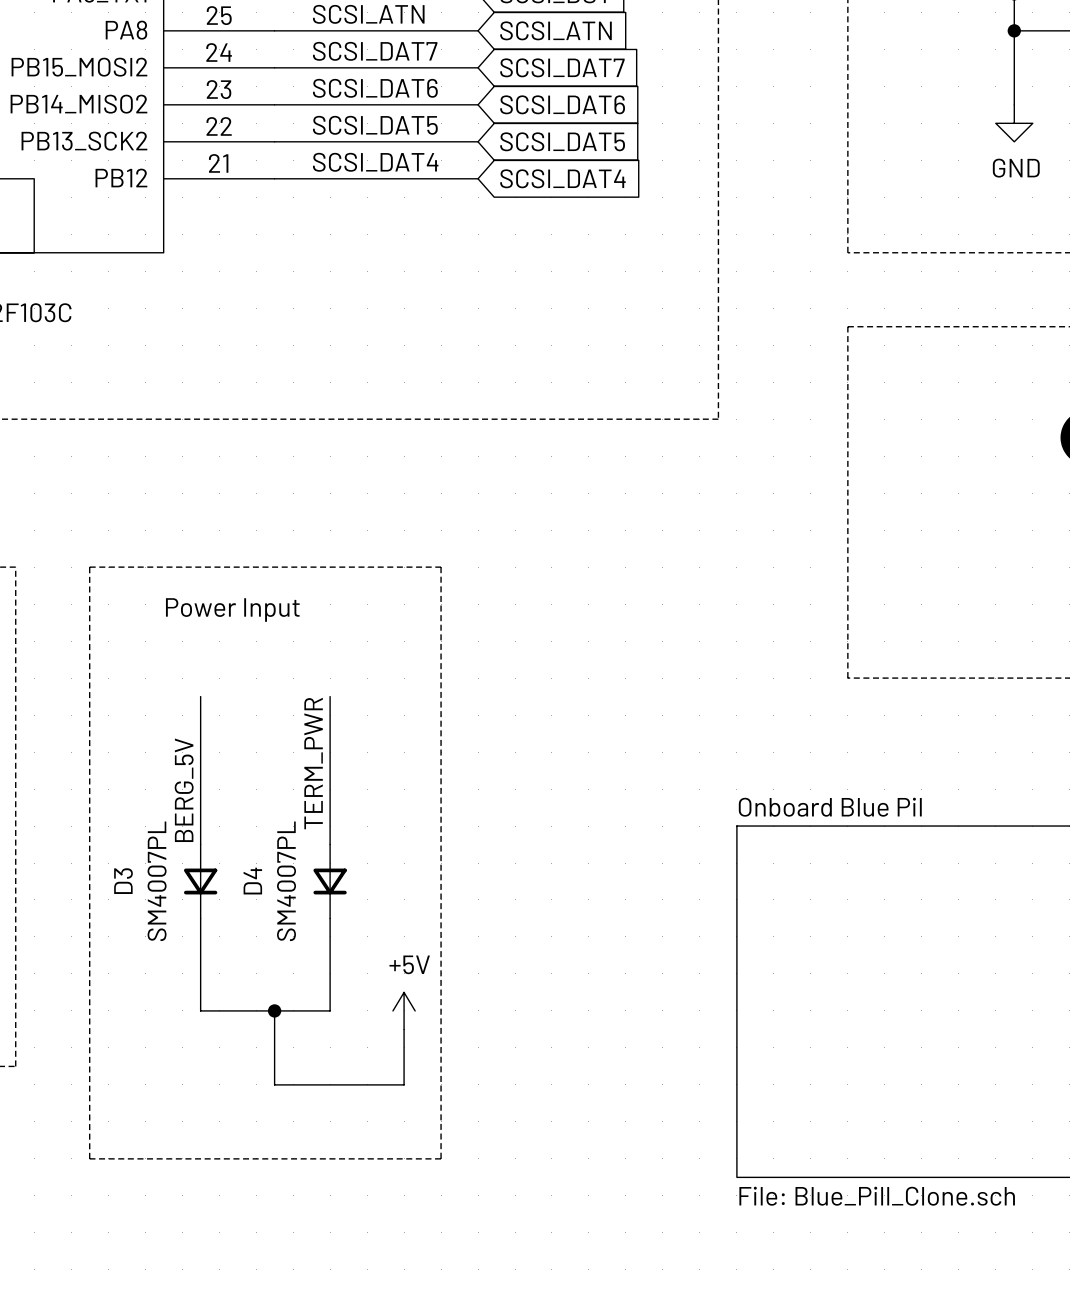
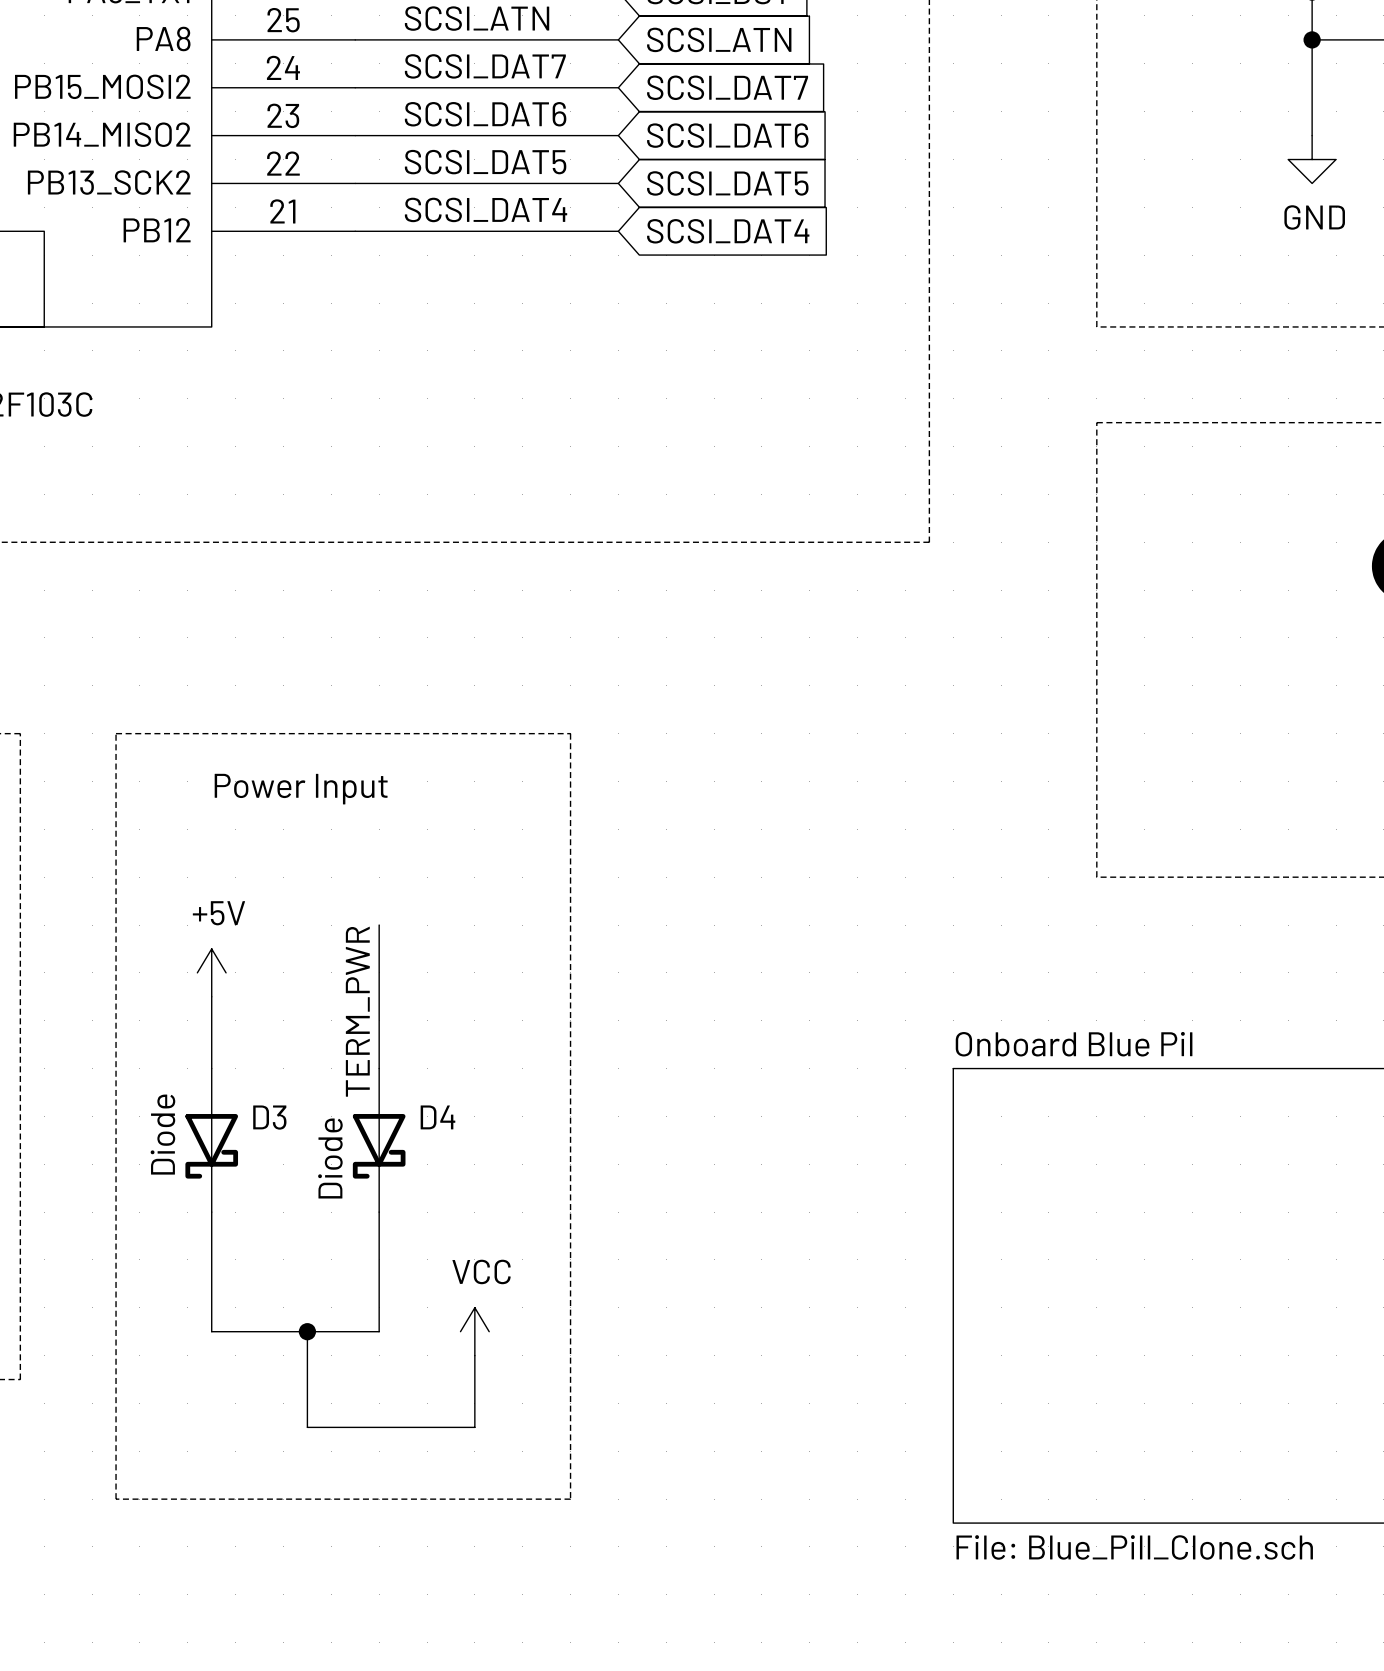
wire: (200, 696) (200, 844) -> none
wire: (330, 696) (330, 844) -> none
wire: none -> (379, 925) (379, 1068)
label position: TERM_PWR (313, 763) -> TERM_PWR (357, 1011)
wire: none -> (211, 996) (211, 1068)
label: BERG_5V (184, 790) -> none
D3 symbol: [184, 844, 218, 919] -> [185, 1068, 239, 1213]
D4 symbol: [313, 844, 347, 919] -> [352, 1068, 406, 1213]
D3 name position: D3 (123, 881) -> D3 (269, 1117)
D3 value: SM4007PL (157, 881) -> Diode (162, 1134)
D4 name position: D4 (252, 881) -> D4 (437, 1117)
D4 value: SM4007PL (286, 881) -> Diode (330, 1158)
wire: (200, 918) (200, 1010) (330, 1010) (330, 918) -> (211, 1212) (211, 1331) (379, 1331) (379, 1212)
wire: (274, 1010) (274, 1084) (404, 1084) (404, 1029) -> (307, 1331) (307, 1427) (474, 1427) (474, 1355)
junction position: (274, 1010) -> (307, 1331)
power symbol position: +5V (404, 1010) -> +5V (211, 972)
power symbol: none -> VCC (474, 1331)

